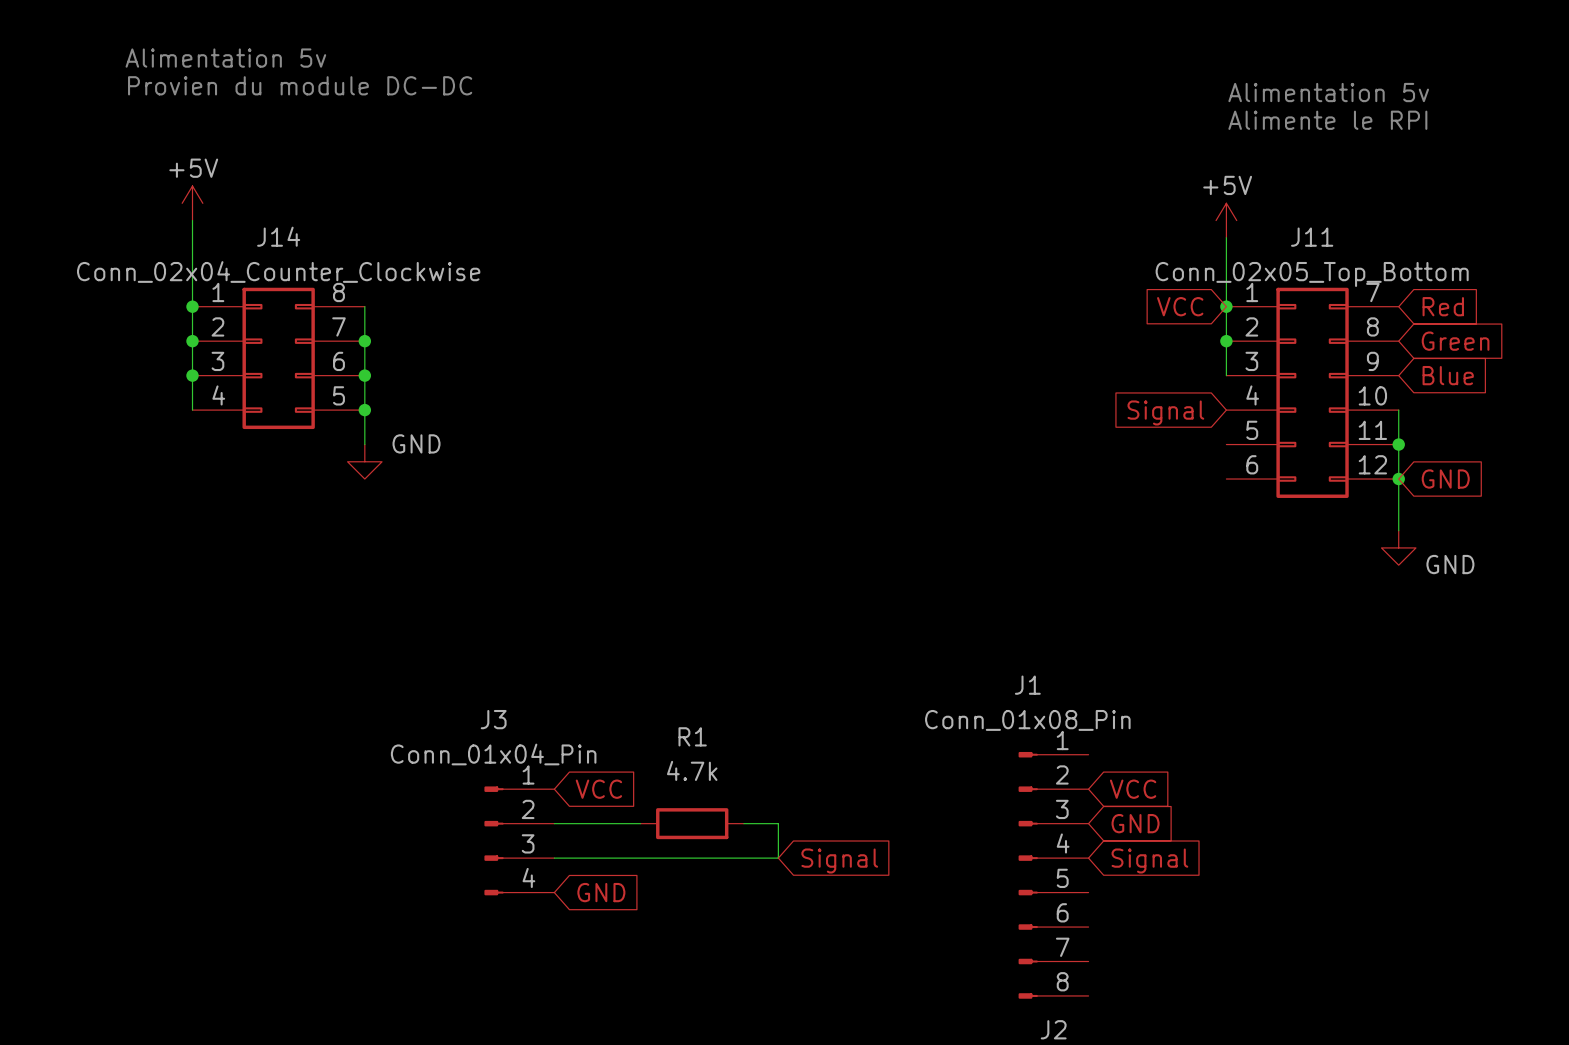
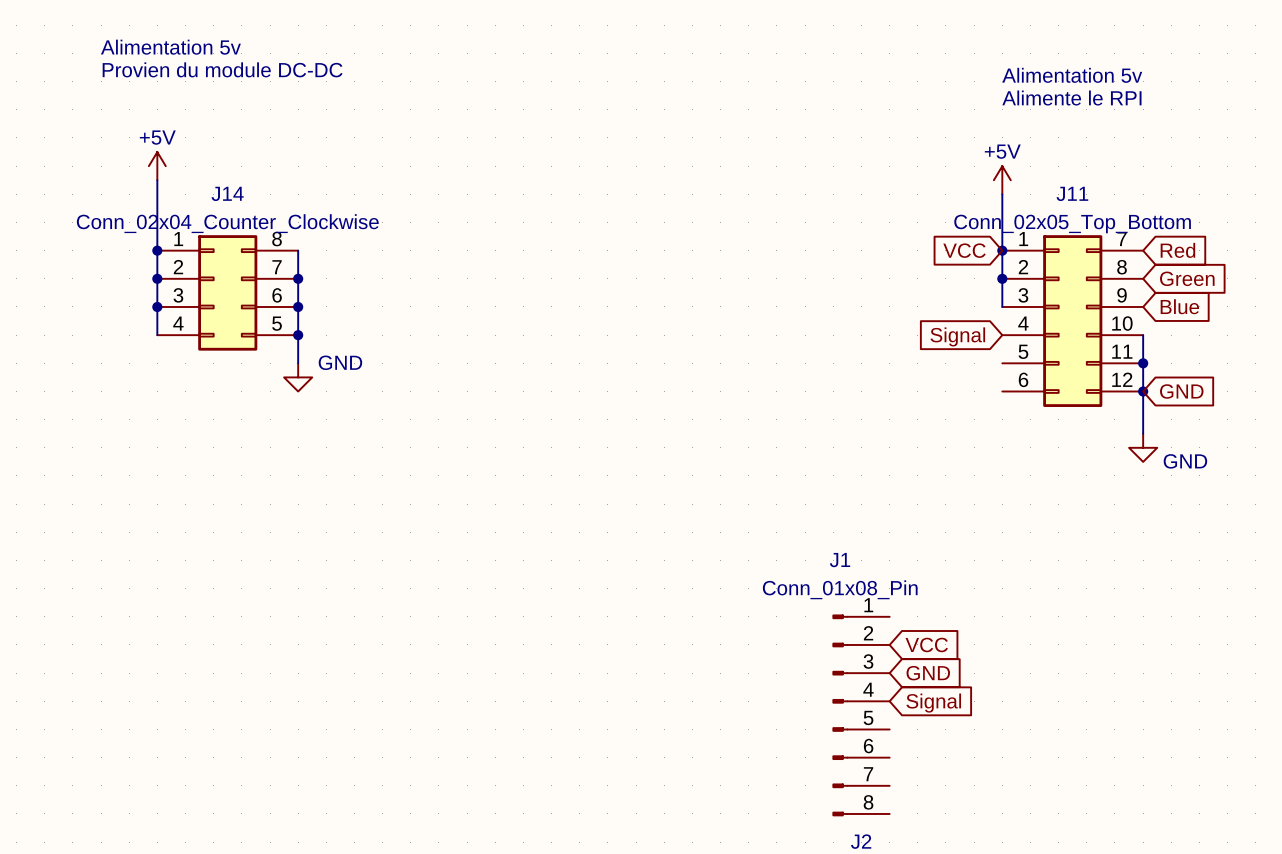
global label: VCC (598, 789) -> none
wire: (554, 823) (640, 823) -> none
R1: 4.7k (692, 823) -> none
wire: (743, 823) (778, 823) (778, 858) (554, 858) -> none
J3: Conn_01x04_Pin (519, 840) -> none
global label: Signal (839, 860) -> none
global label: GND (601, 892) -> none

